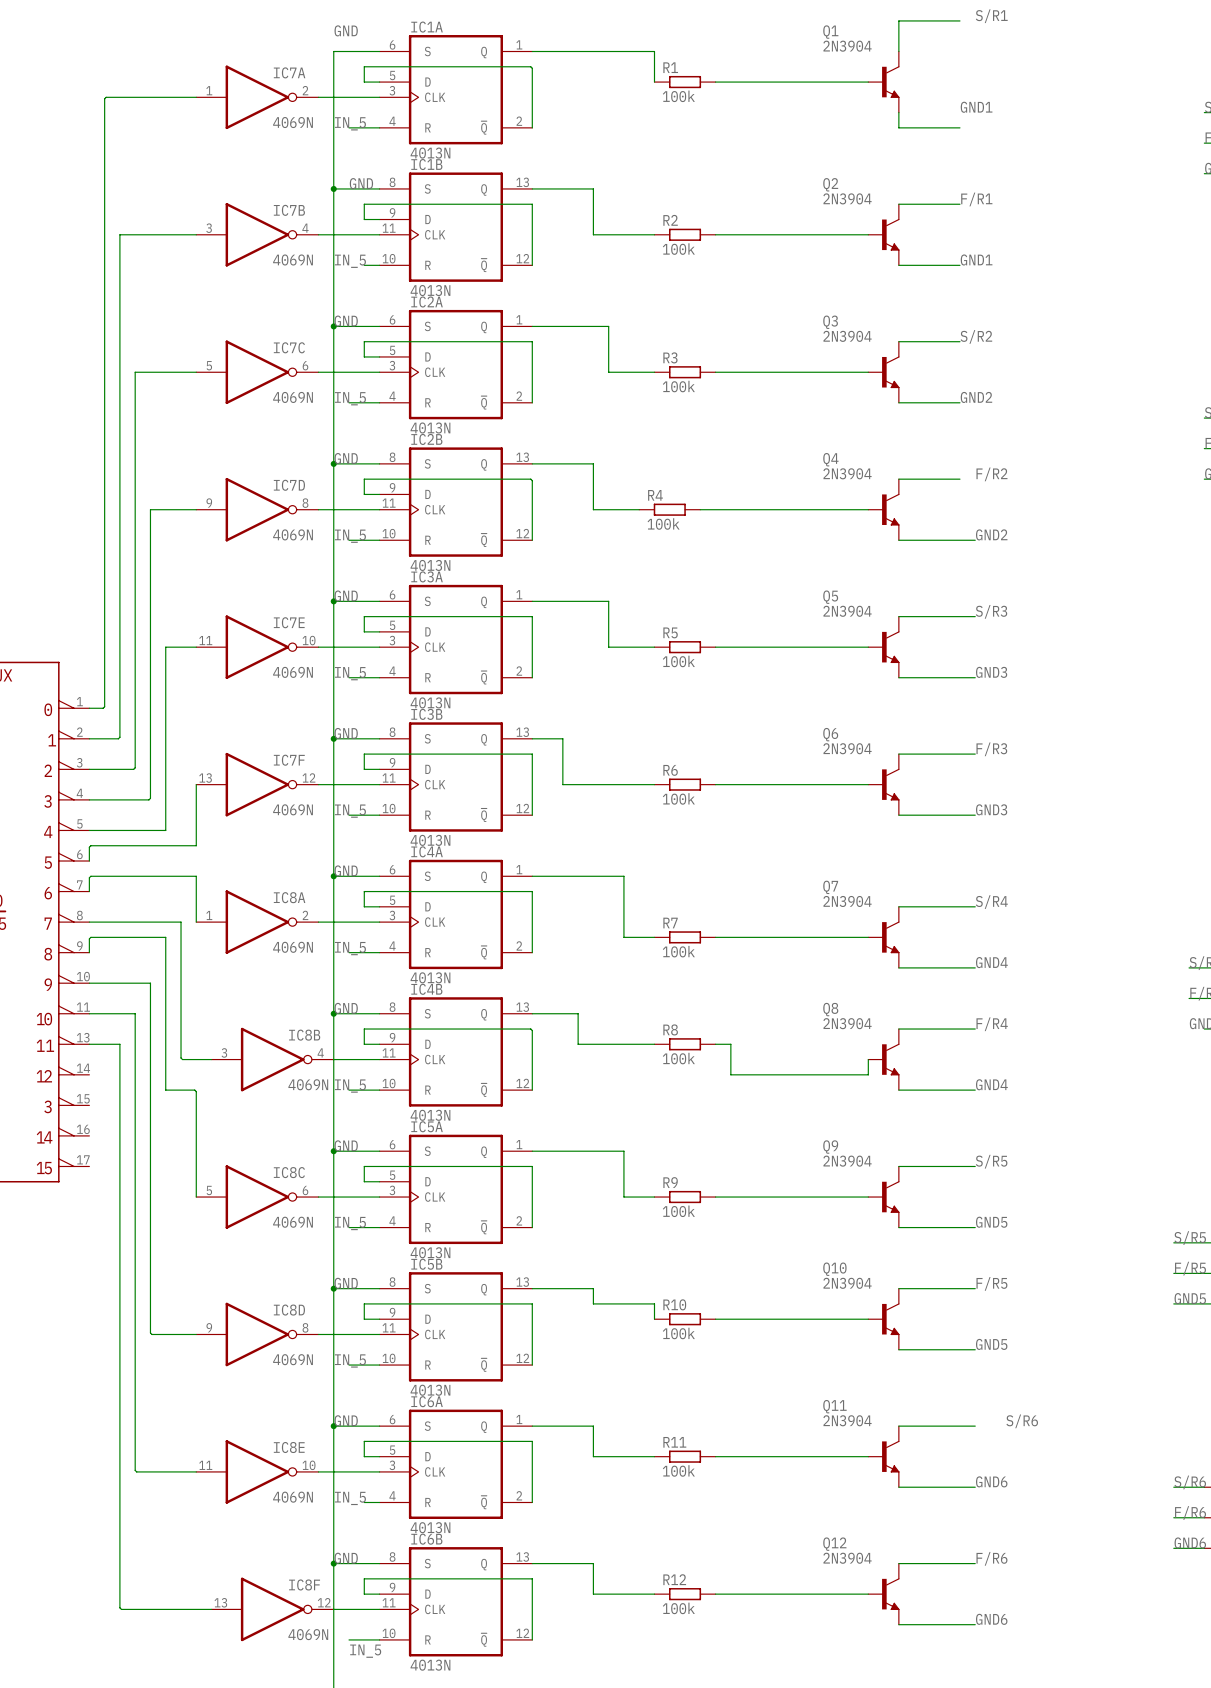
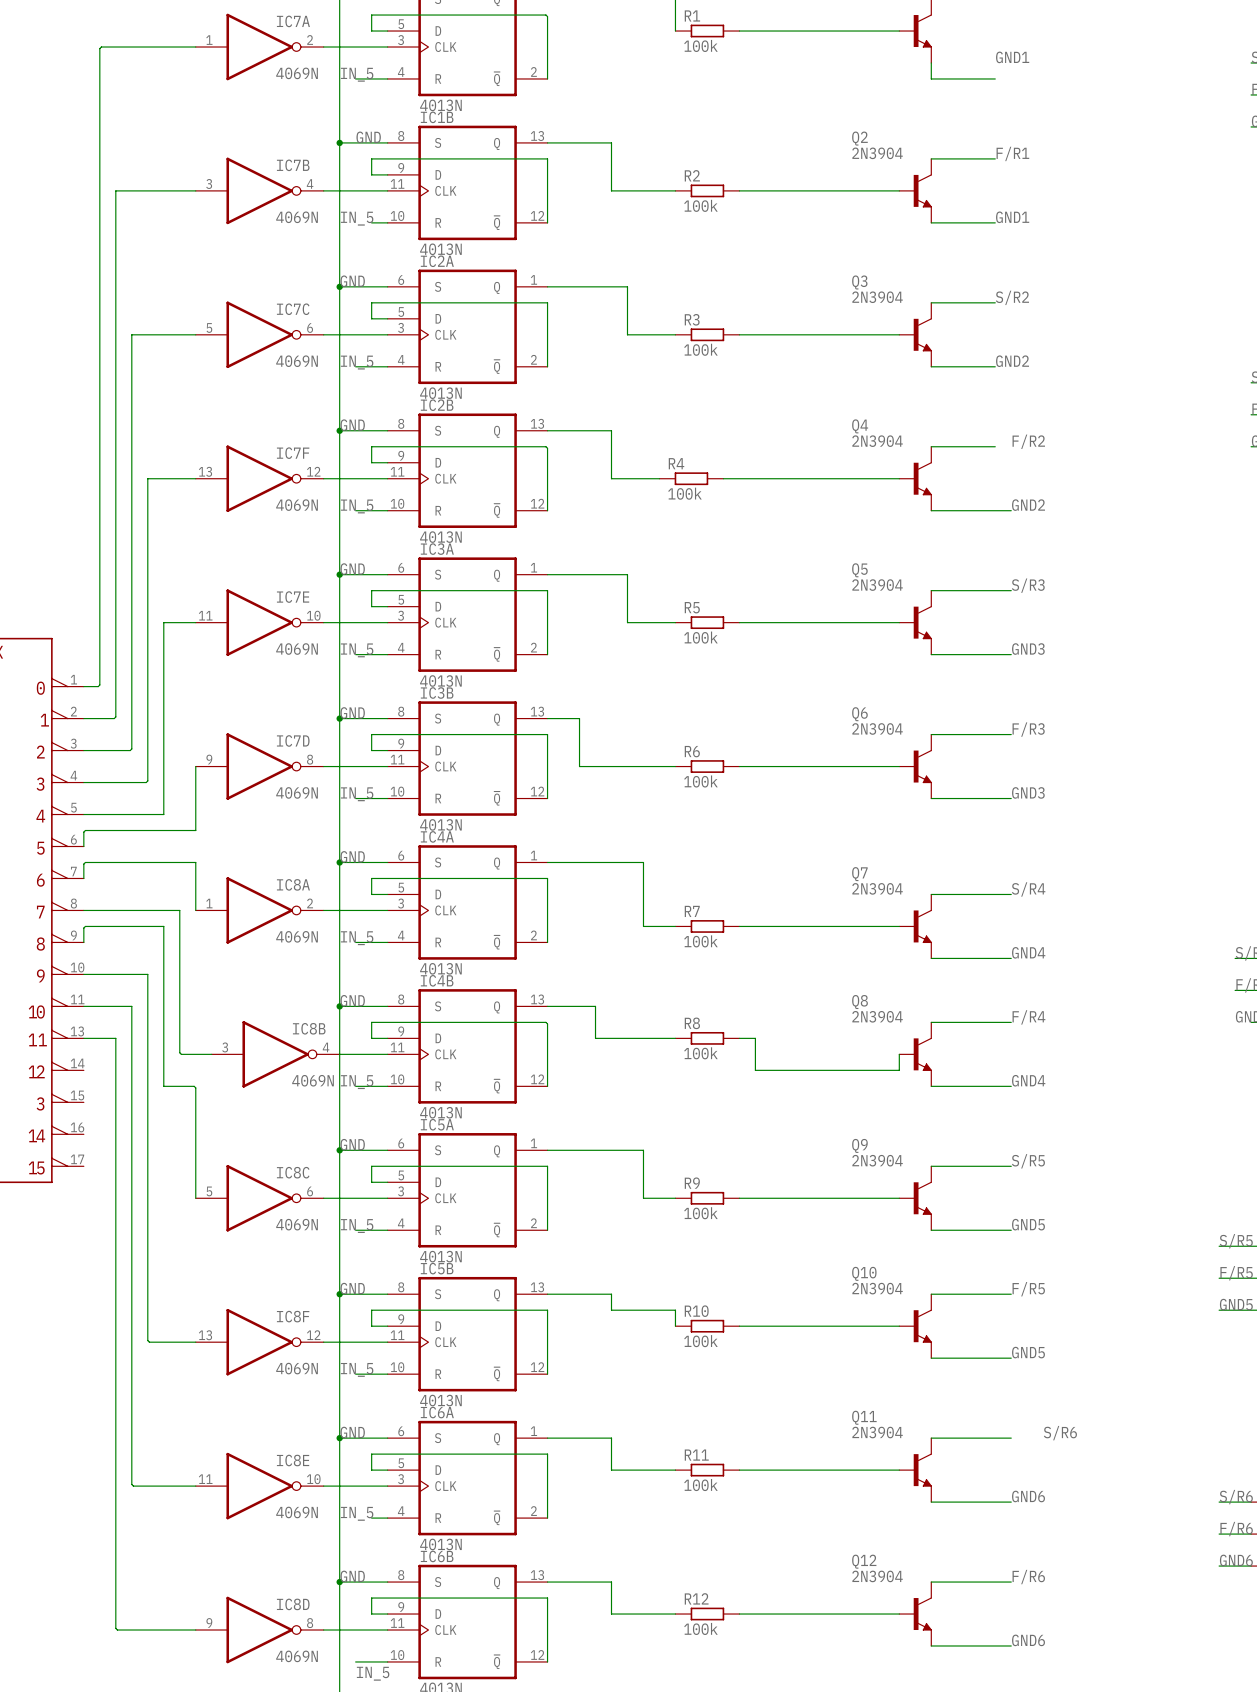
IC7D position: (257, 509) -> (259, 766)
IC7F position: (257, 784) -> (259, 478)
IC8D position: (257, 1334) -> (259, 1630)
IC8F position: (272, 1609) -> (259, 1342)

